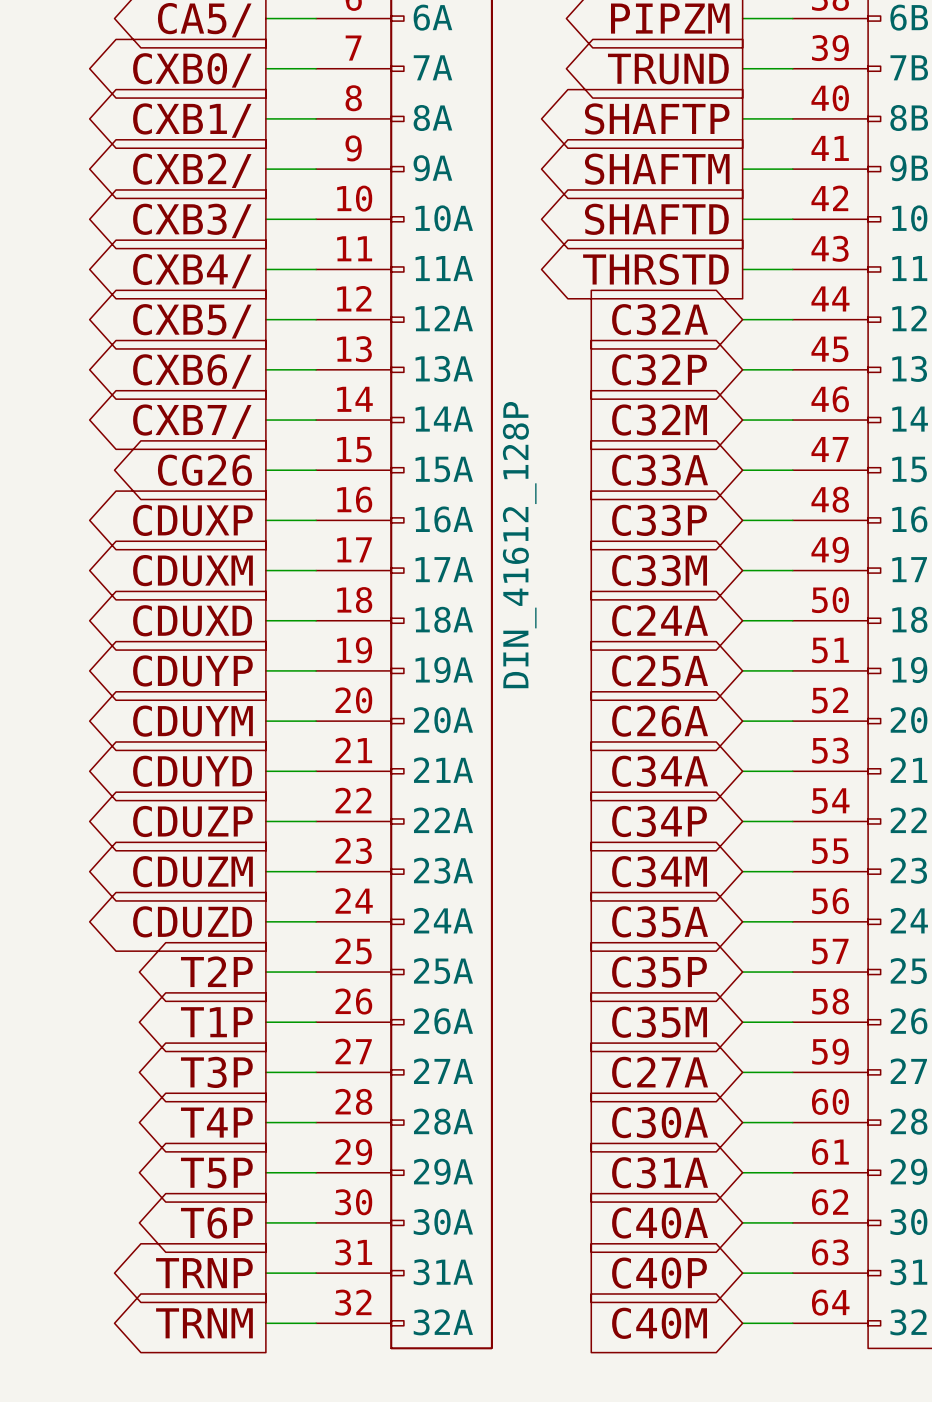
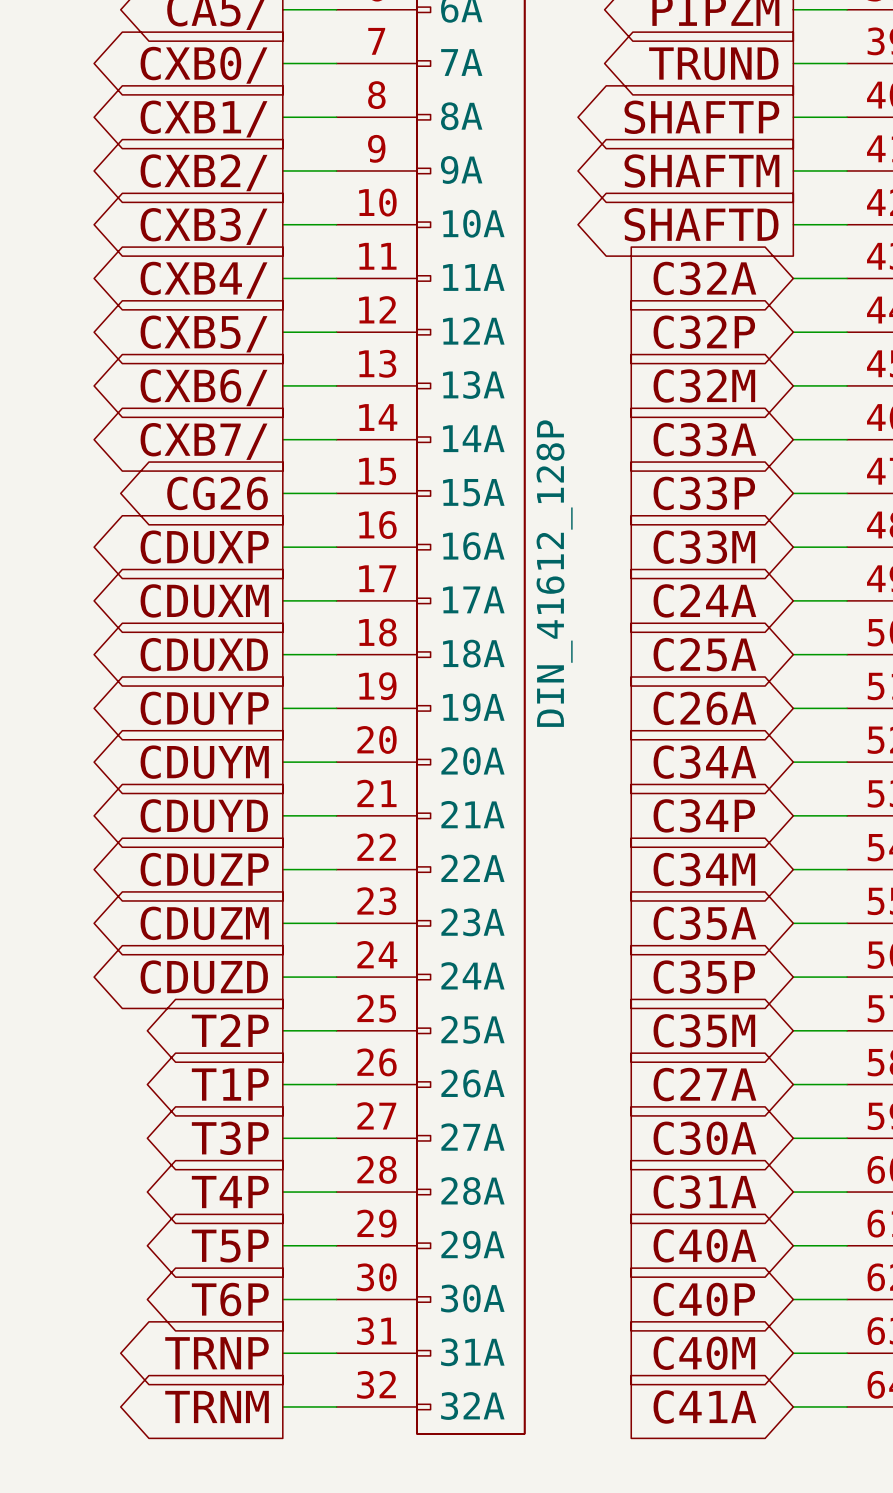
global label shape: output (655, 269) -> input (704, 278)
global label: THRSTD (655, 269) -> C32A (704, 278)
global label: C32A (660, 319) -> C32P (704, 332)
global label: C32P (659, 369) -> C32M (704, 385)
global label: C32M (659, 420) -> C33A (704, 439)
global label: C33A (660, 470) -> C33P (704, 493)
global label: C33P (659, 520) -> C33M (704, 547)
global label: C33M (659, 570) -> C24A (704, 600)
global label: C24A (660, 620) -> C25A (704, 654)
global label: C25A (660, 670) -> C26A (704, 708)
global label: C26A (660, 721) -> C34A (704, 762)
global label: C34A (660, 771) -> C34P (704, 815)
global label: C34P (659, 821) -> C34M (704, 869)
global label: C34M (659, 871) -> C35A (704, 923)
global label: C35A (660, 921) -> C35P (704, 977)
global label: C35P (659, 972) -> C35M (704, 1030)
global label: C35M (659, 1022) -> C27A (704, 1084)
global label: C27A (660, 1072) -> C30A (704, 1138)
global label: C30A (660, 1122) -> C31A (704, 1192)
global label: C31A (660, 1172) -> C40A (704, 1245)
global label: C40A (660, 1222) -> C40P (704, 1299)
global label: C40P (659, 1273) -> C40M (704, 1353)
global label: C40M (659, 1323) -> C41A (704, 1407)

